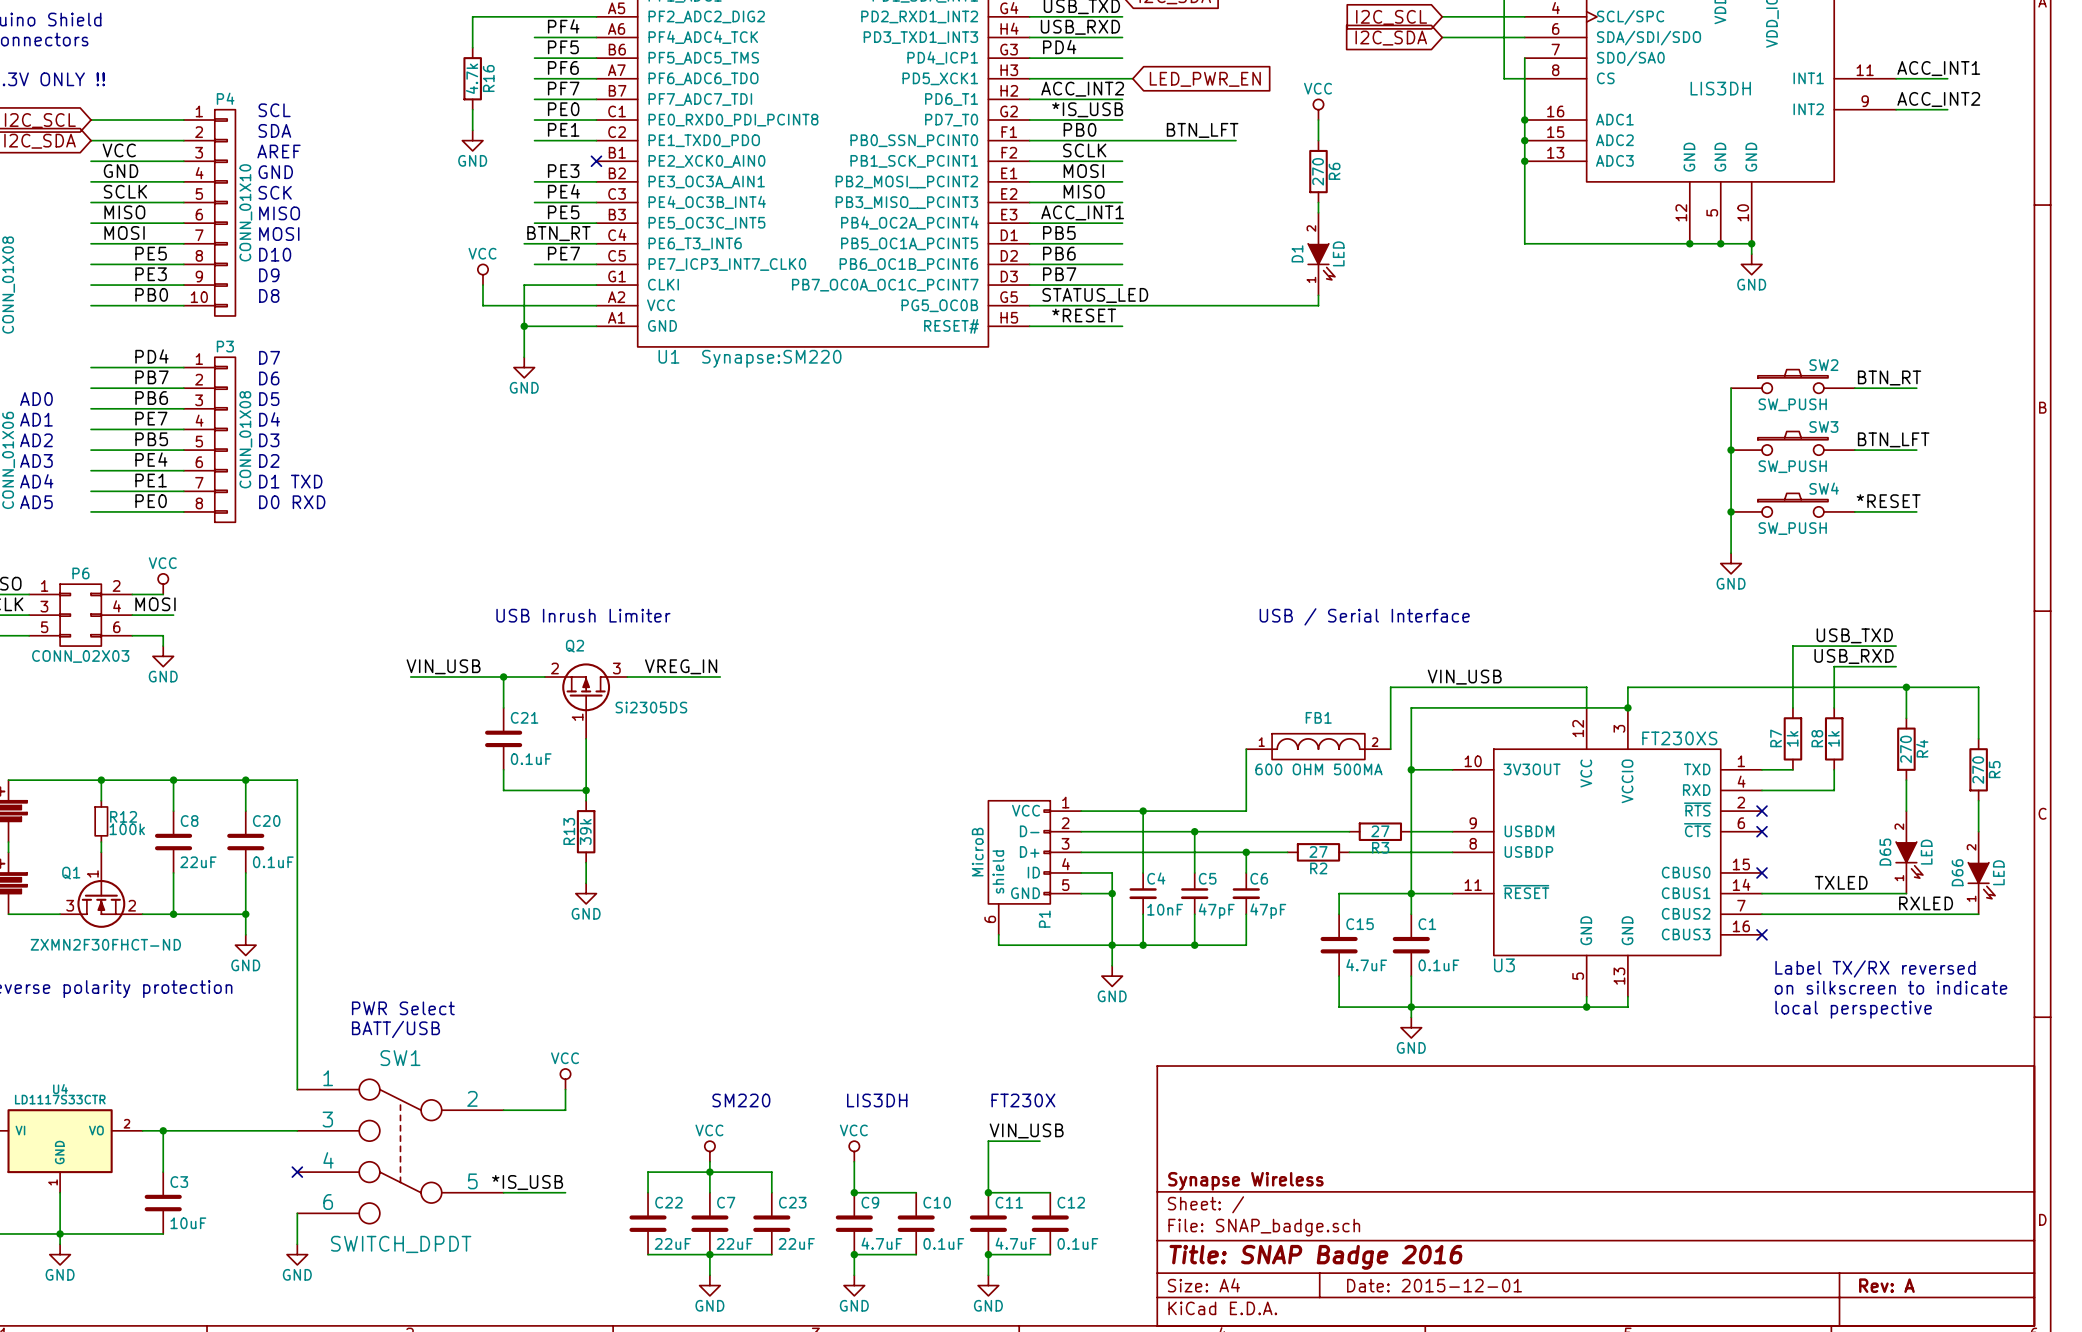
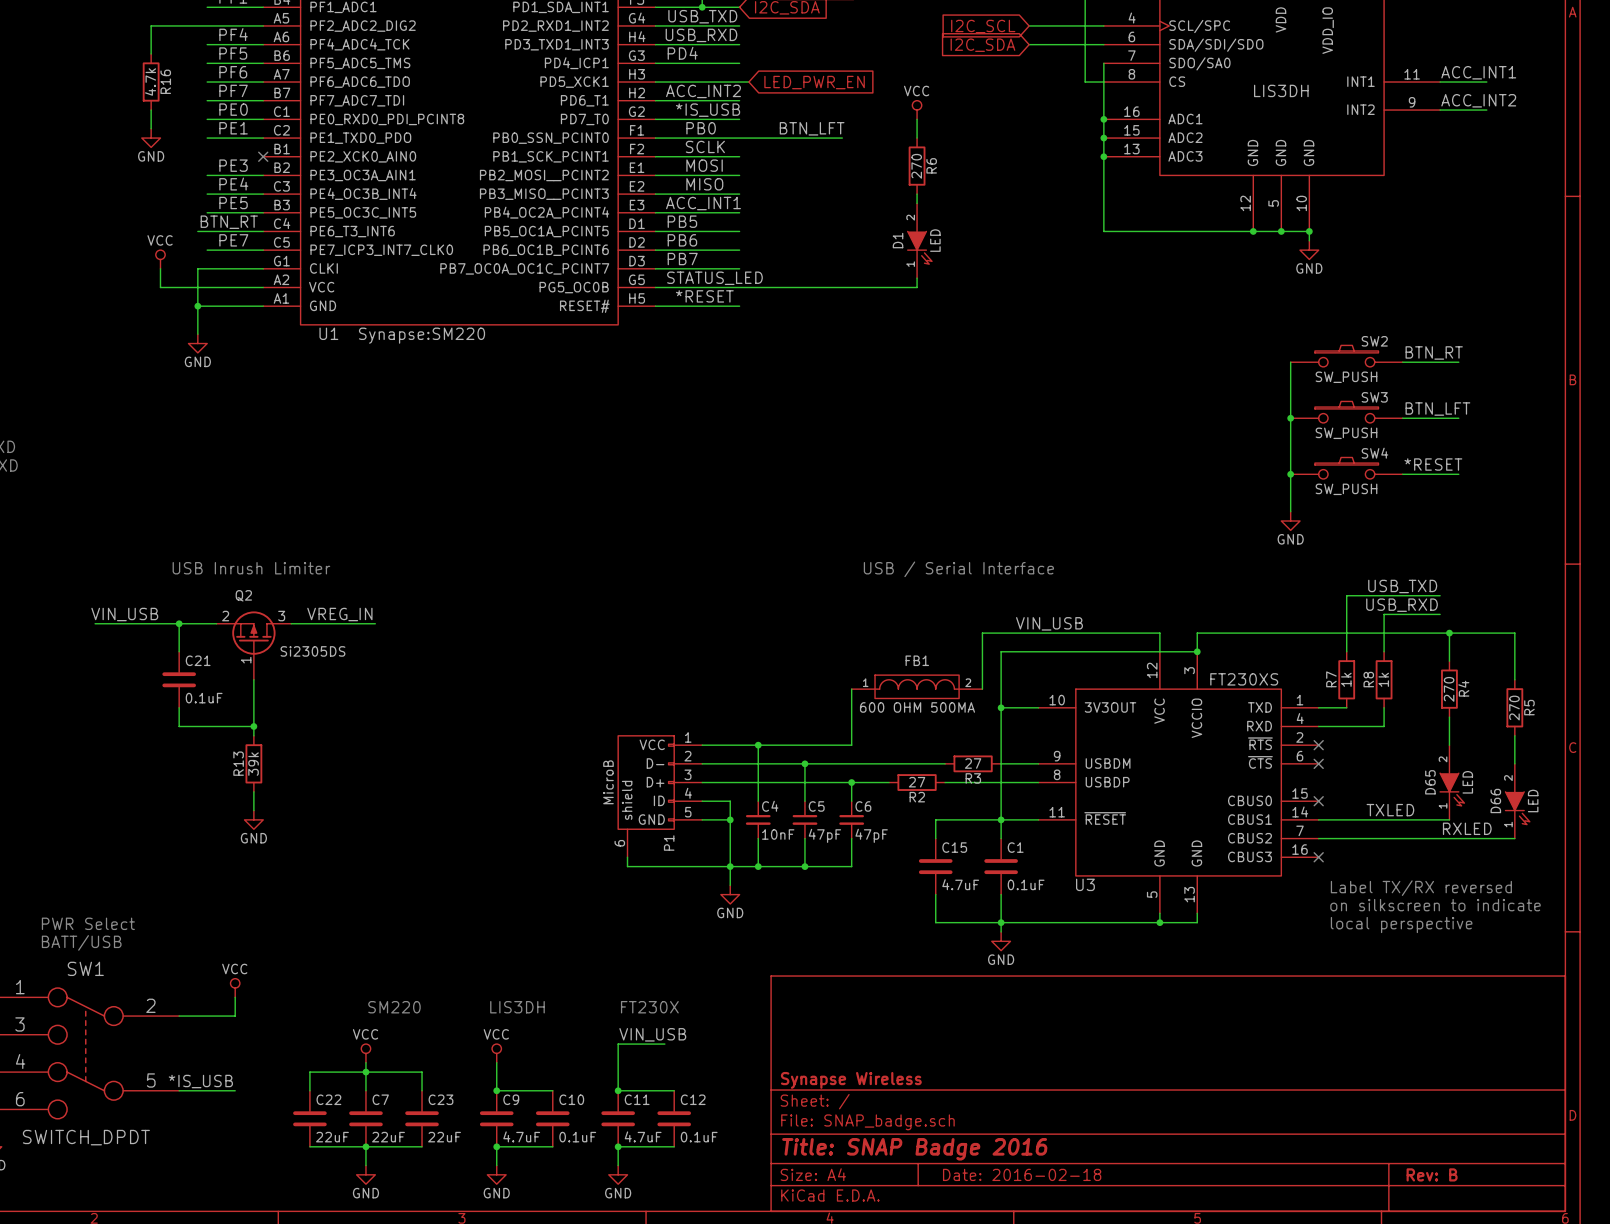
title block: Date: 2015-12-01 (1434, 1285) -> Date: 2016-02-18 (1022, 1174)
title block: Rev: A (1886, 1285) -> Rev: B (1432, 1174)

